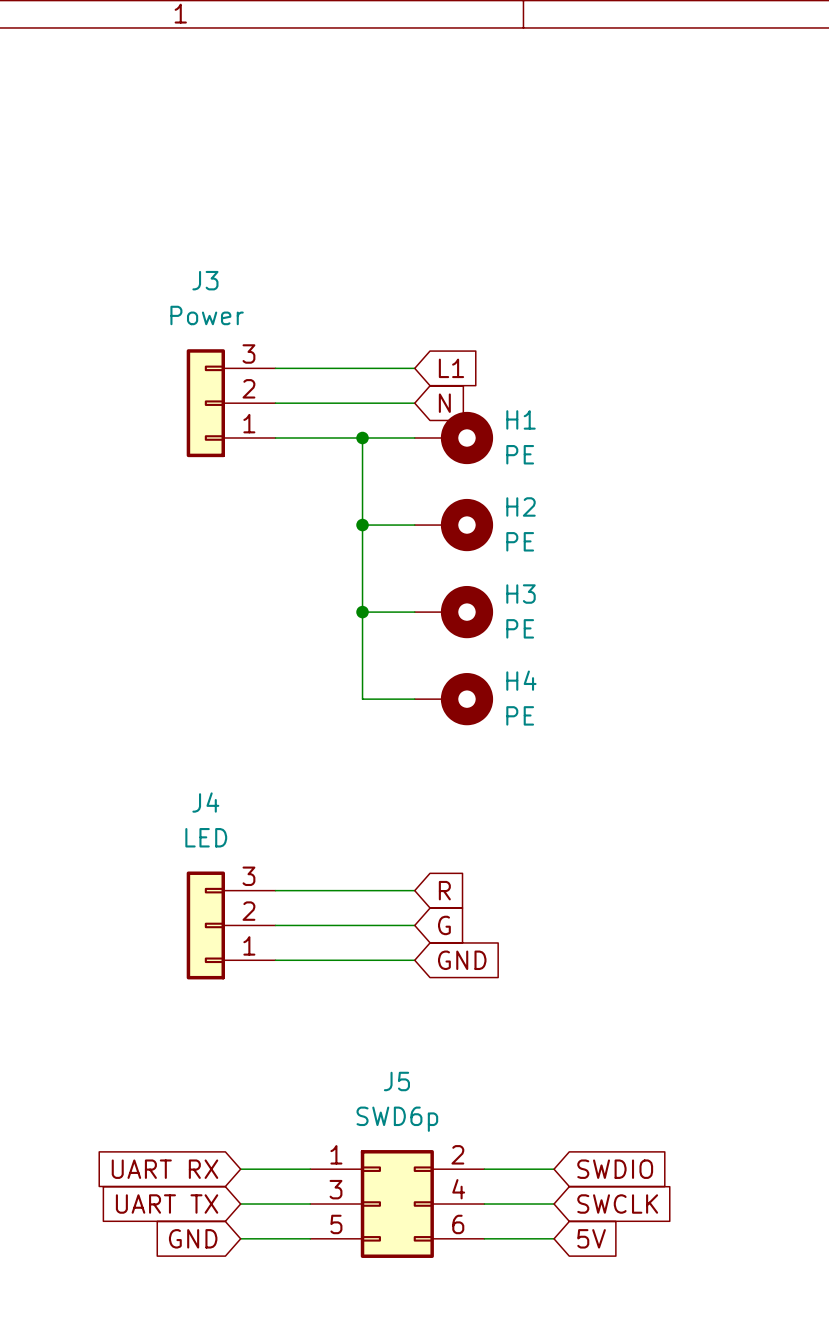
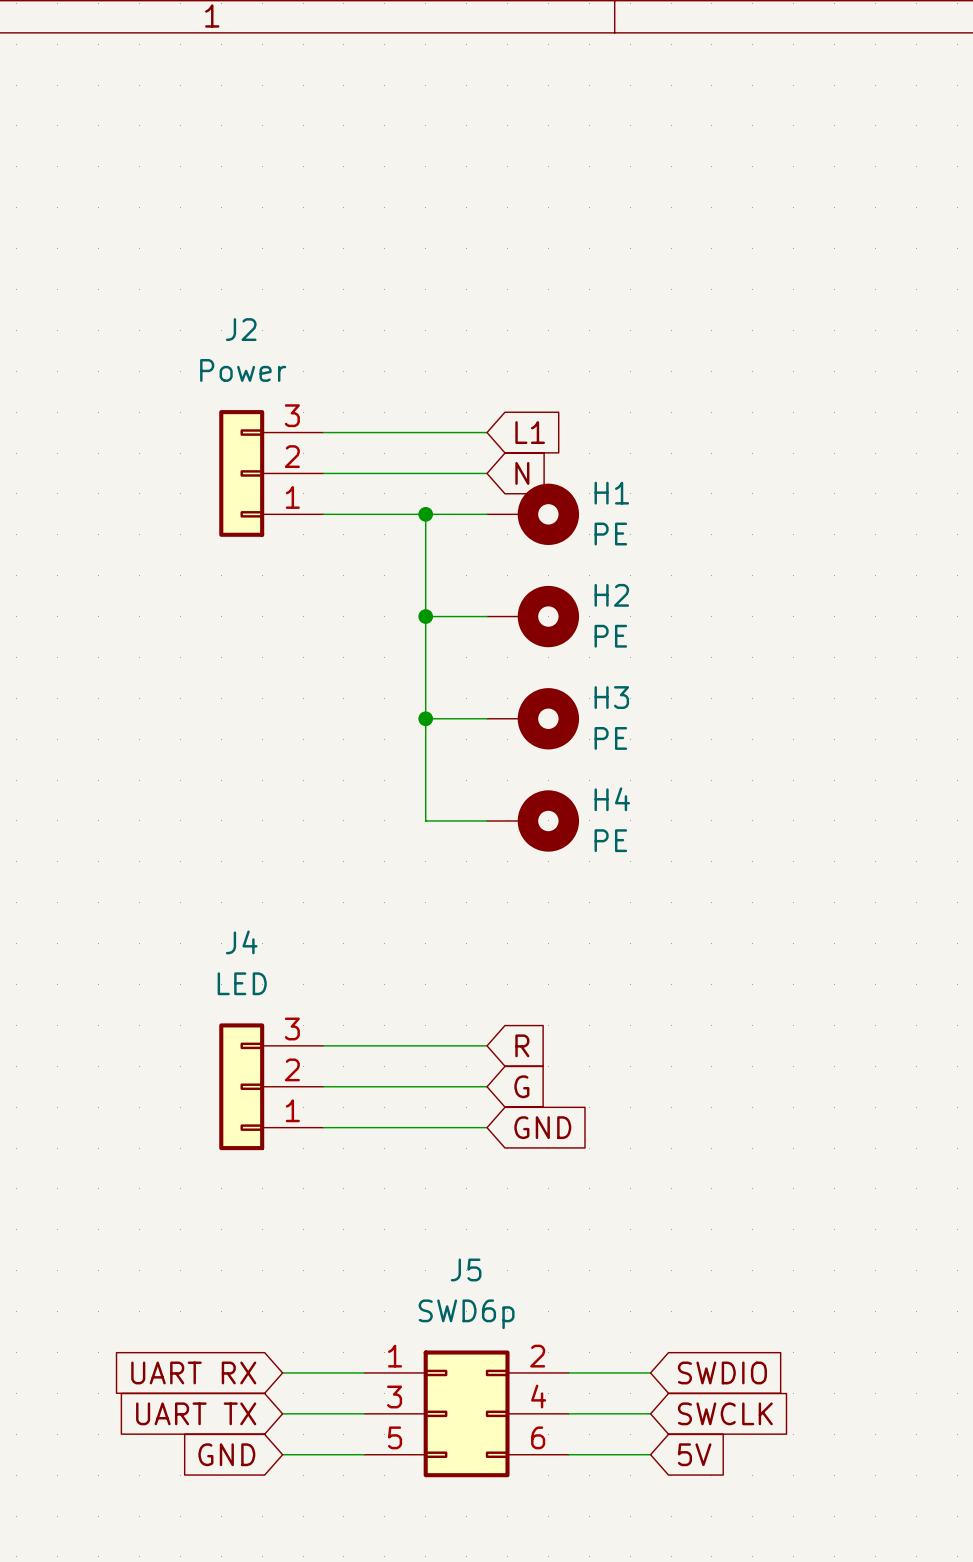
J3 name: J3 (205, 280) -> J2 (241, 329)

